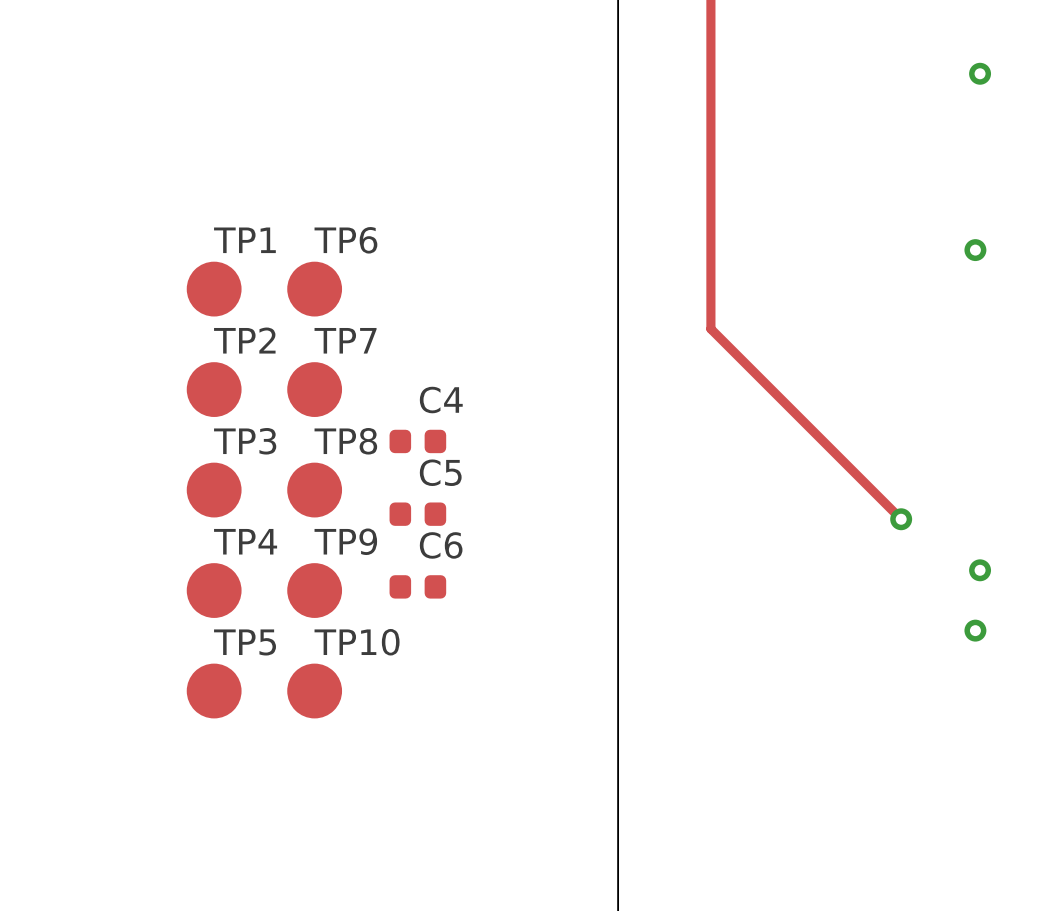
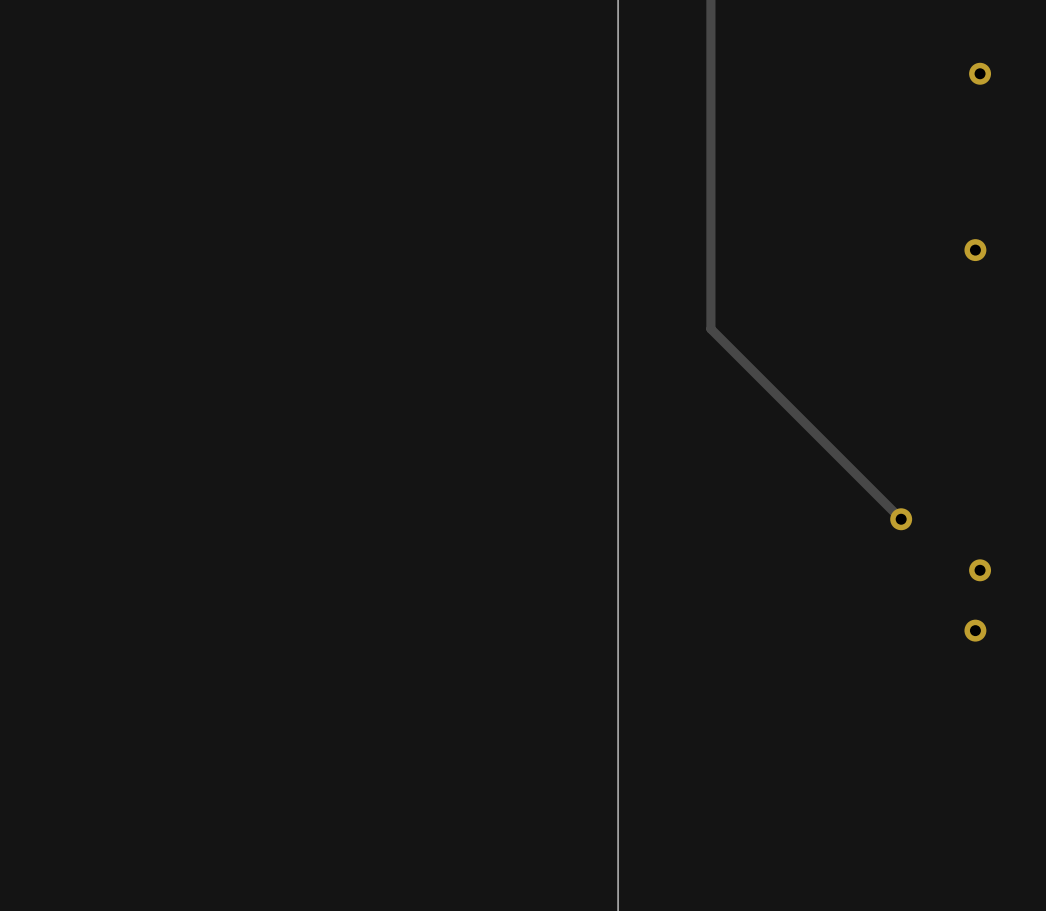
TP1: (214, 289) -> none
TP6: (314, 289) -> none
TP2: (214, 389) -> none
TP7: (314, 389) -> none
C4: (417, 441) -> none
TP3: (214, 490) -> none
TP8: (314, 490) -> none
C5: (417, 514) -> none
C6: (417, 586) -> none
TP4: (214, 590) -> none
TP9: (314, 590) -> none
TP5: (214, 691) -> none
TP10: (314, 691) -> none

